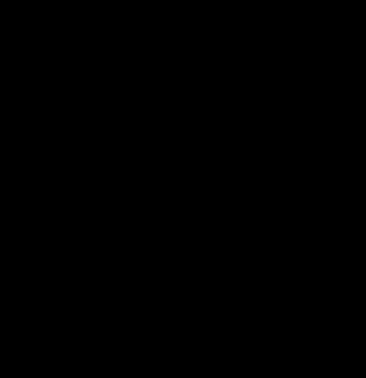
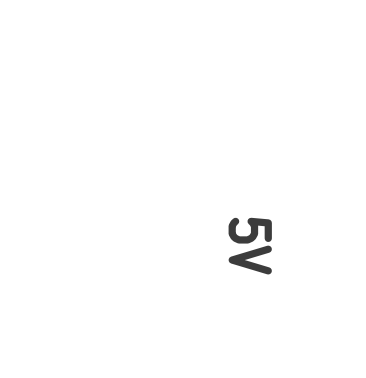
text: none -> 5V (250, 246)

